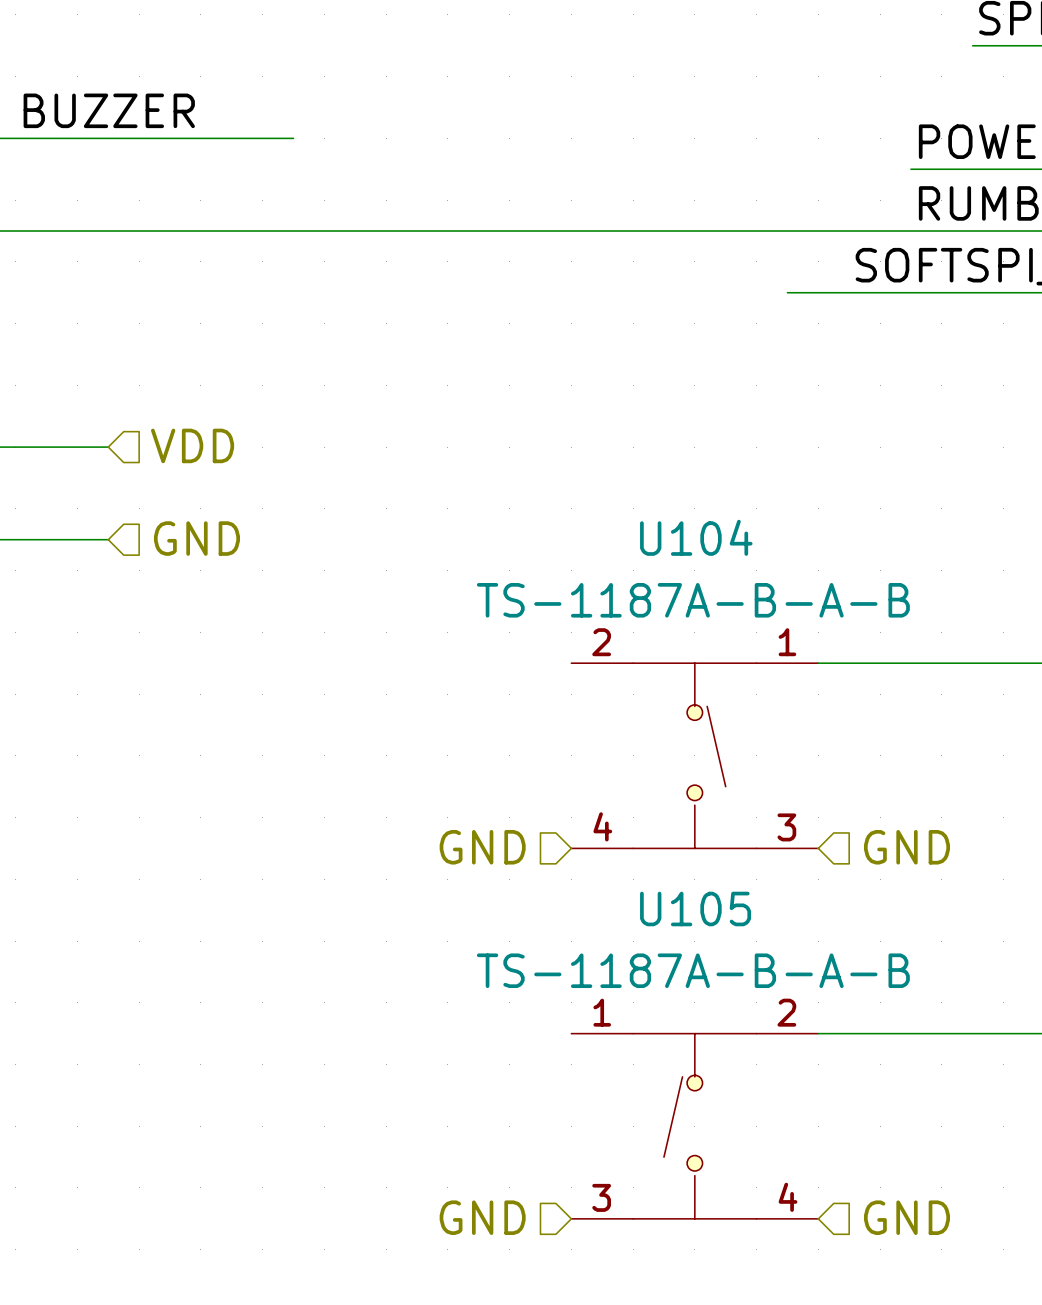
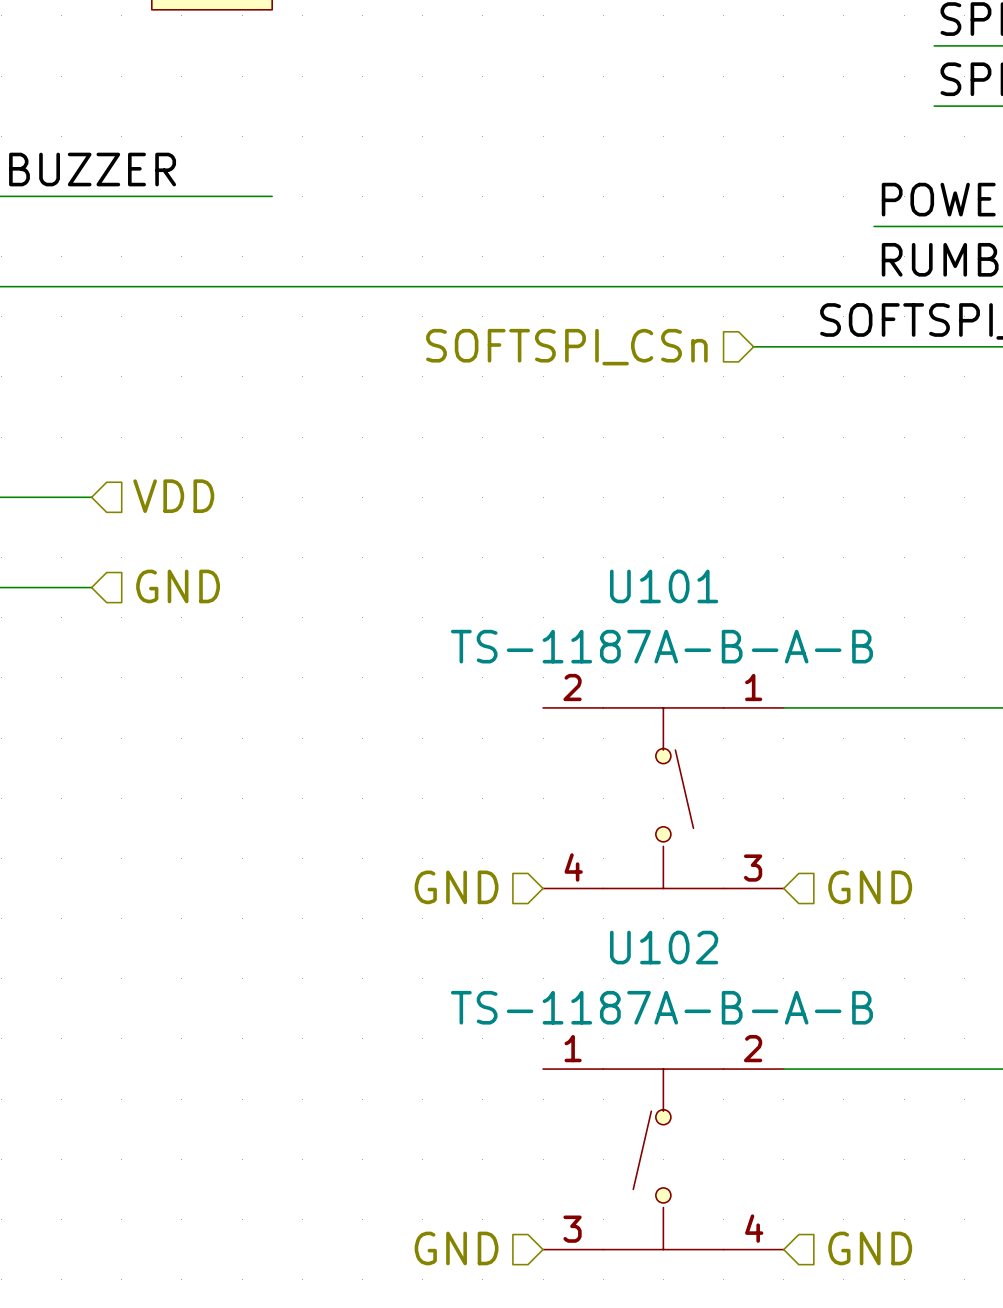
hierarchical label: none -> SOFTSPI_CSn (566, 347)
U104 name: U104 (696, 537) -> U101 (664, 586)
U105 name: U105 (695, 909) -> U102 (664, 947)

